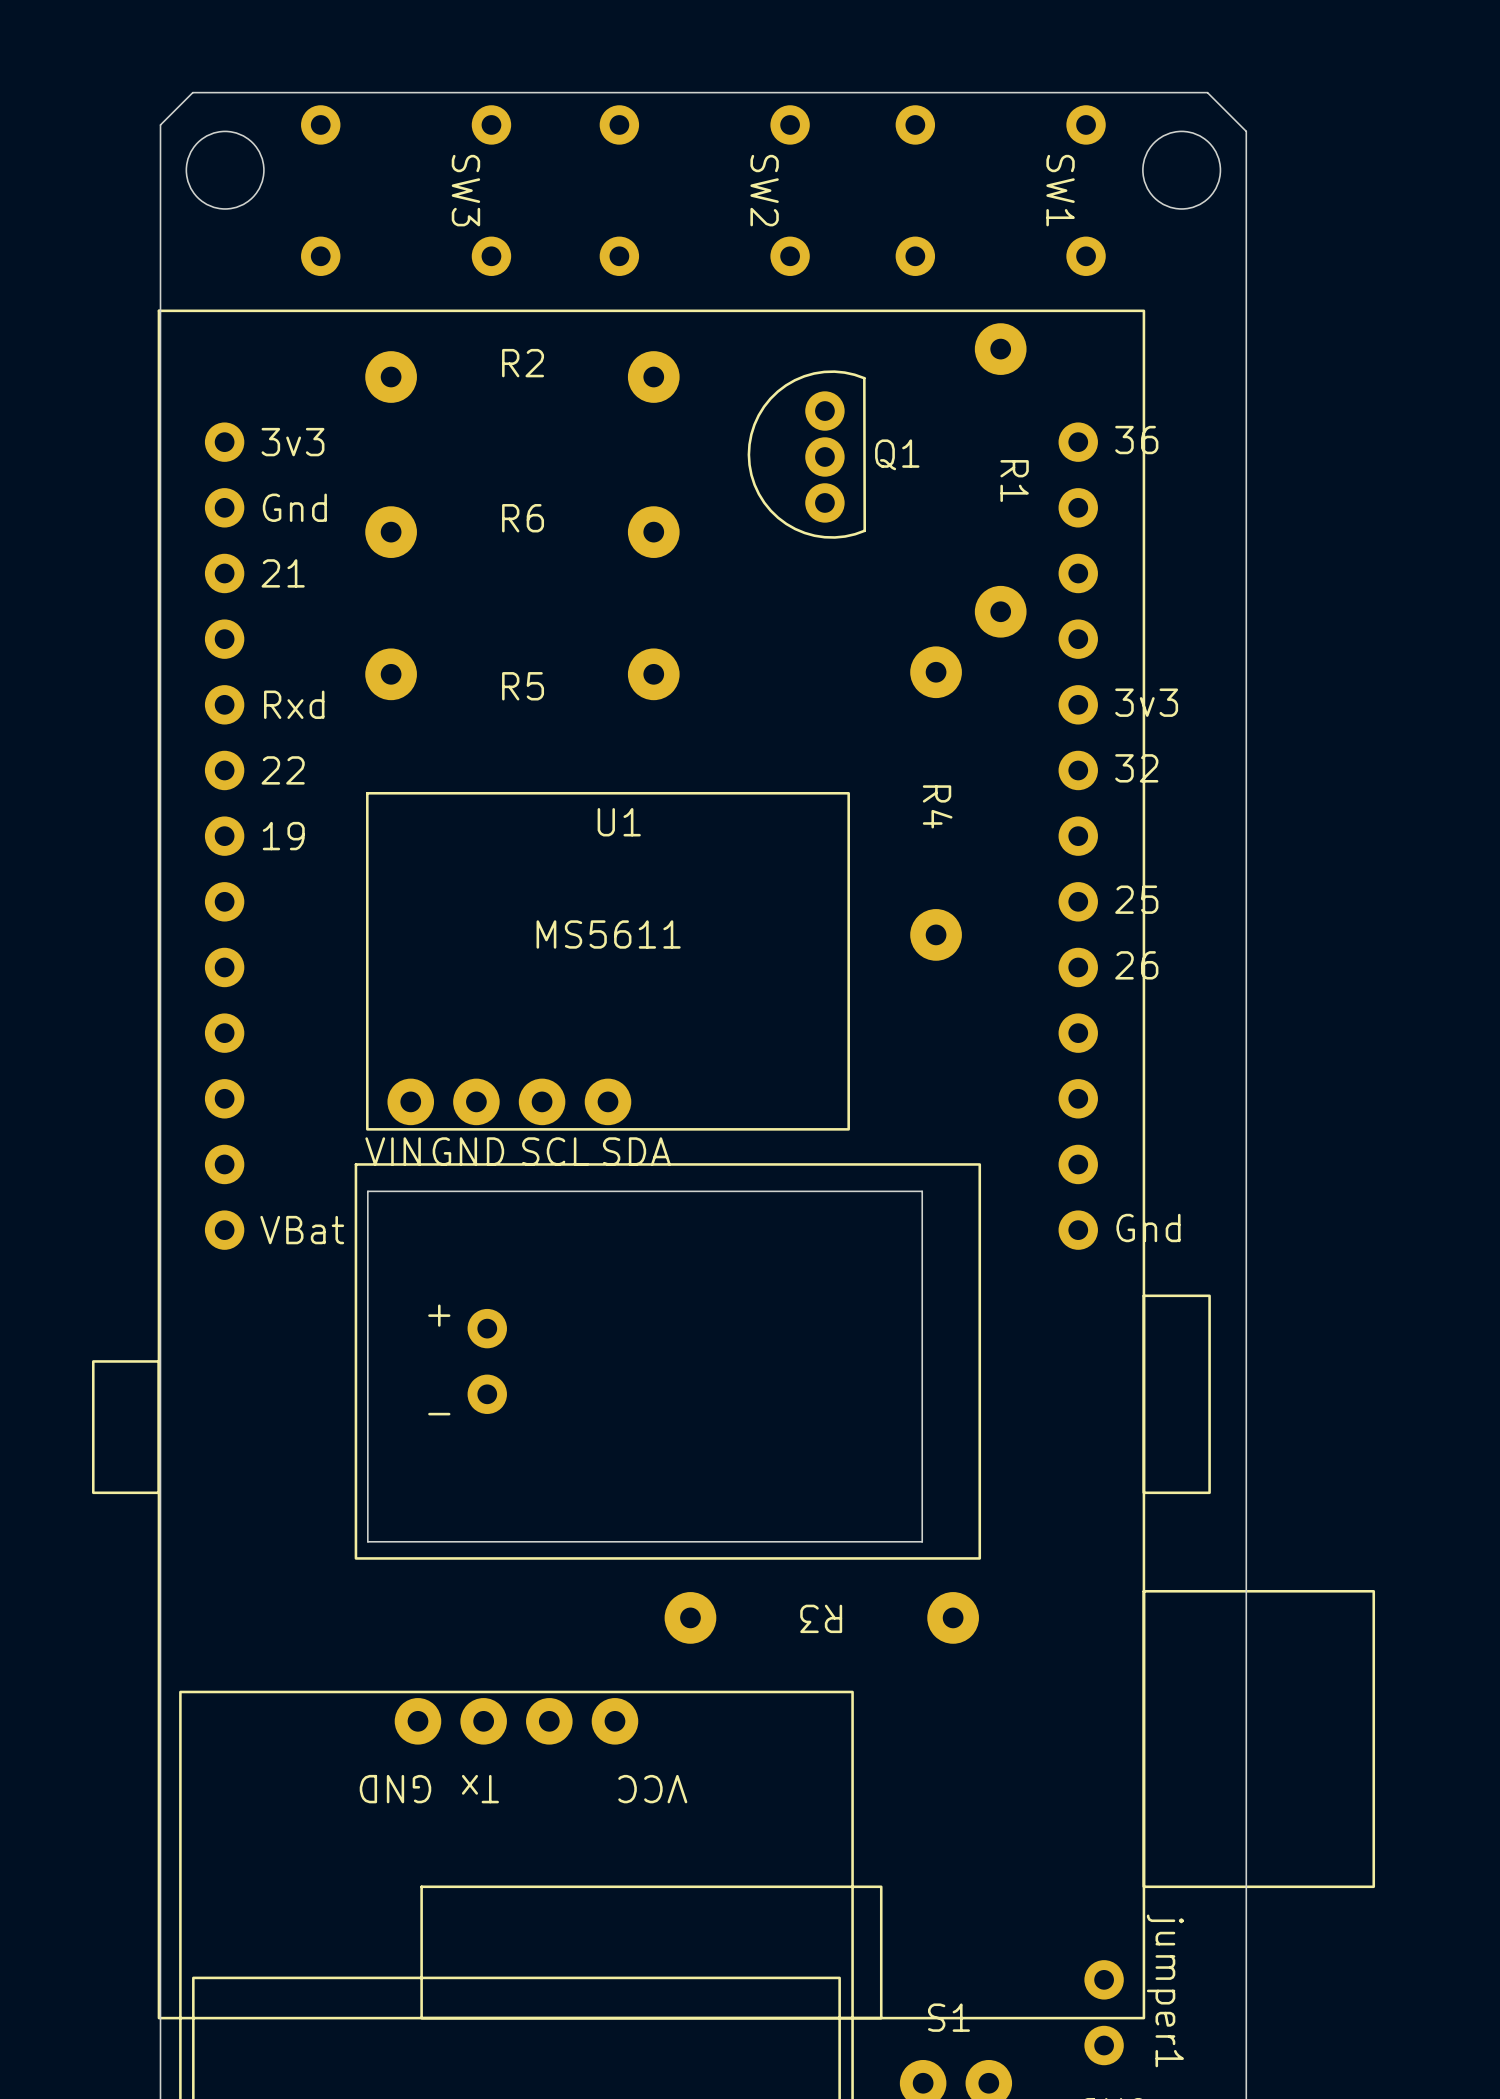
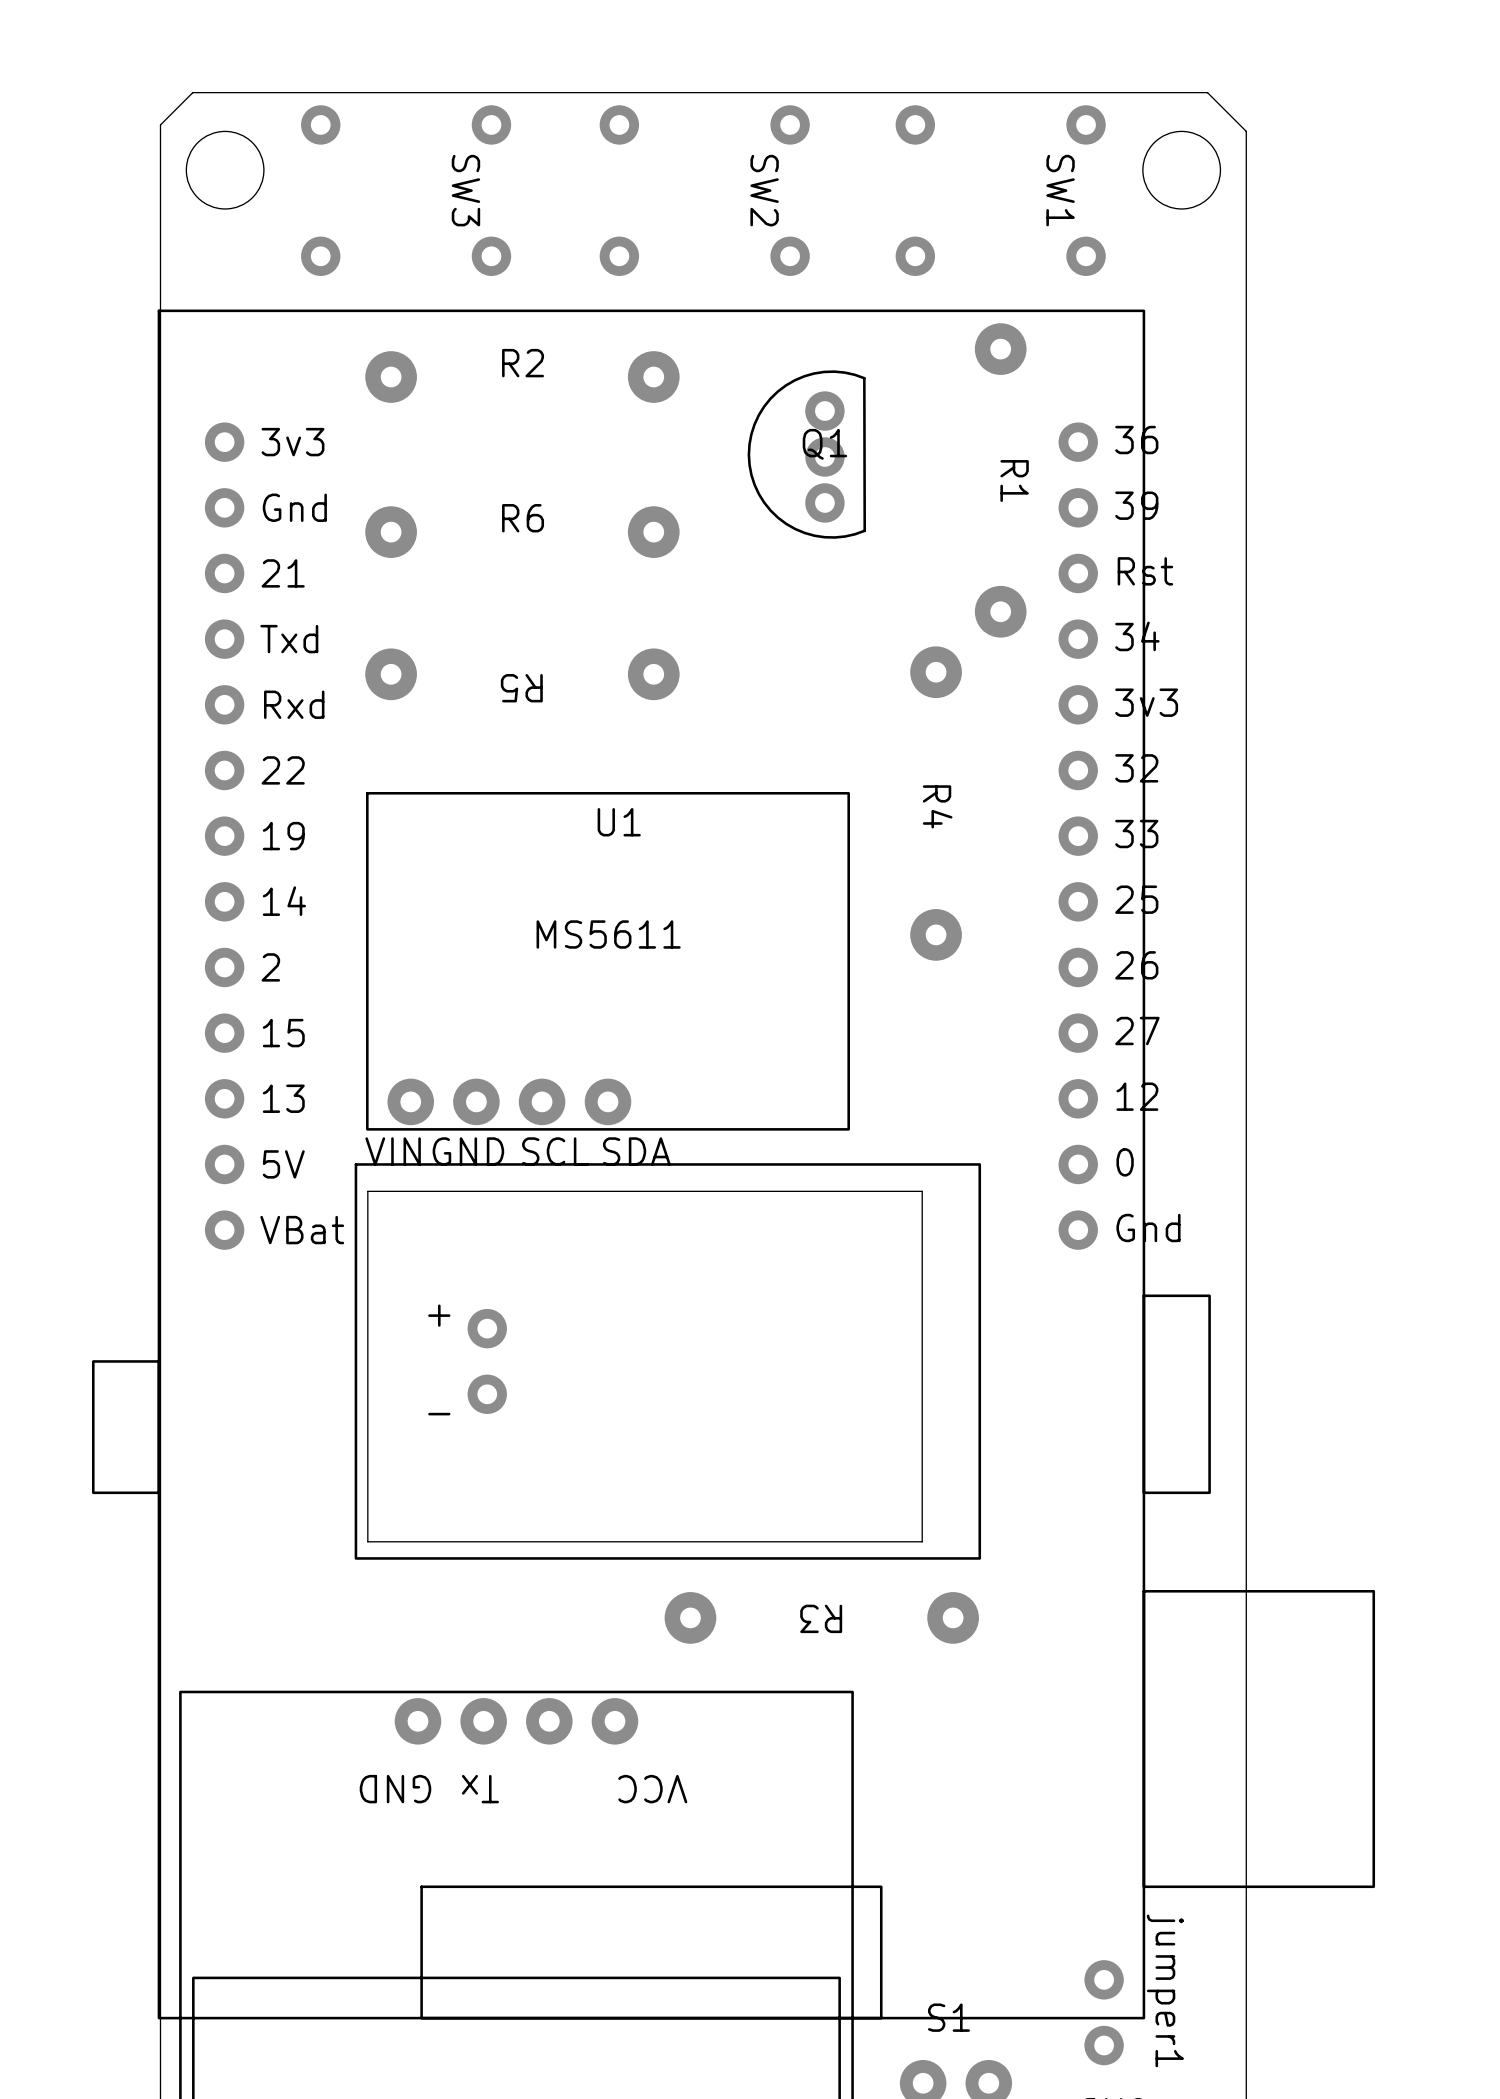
U1 footprint: [91, 309, 1376, 2020] -> [91, 309, 1376, 2020]
Q1 name position: Q1 (897, 454) -> Q1 (824, 444)
R5 name rotation: 0° (523, 686) -> 180° (521, 688)

